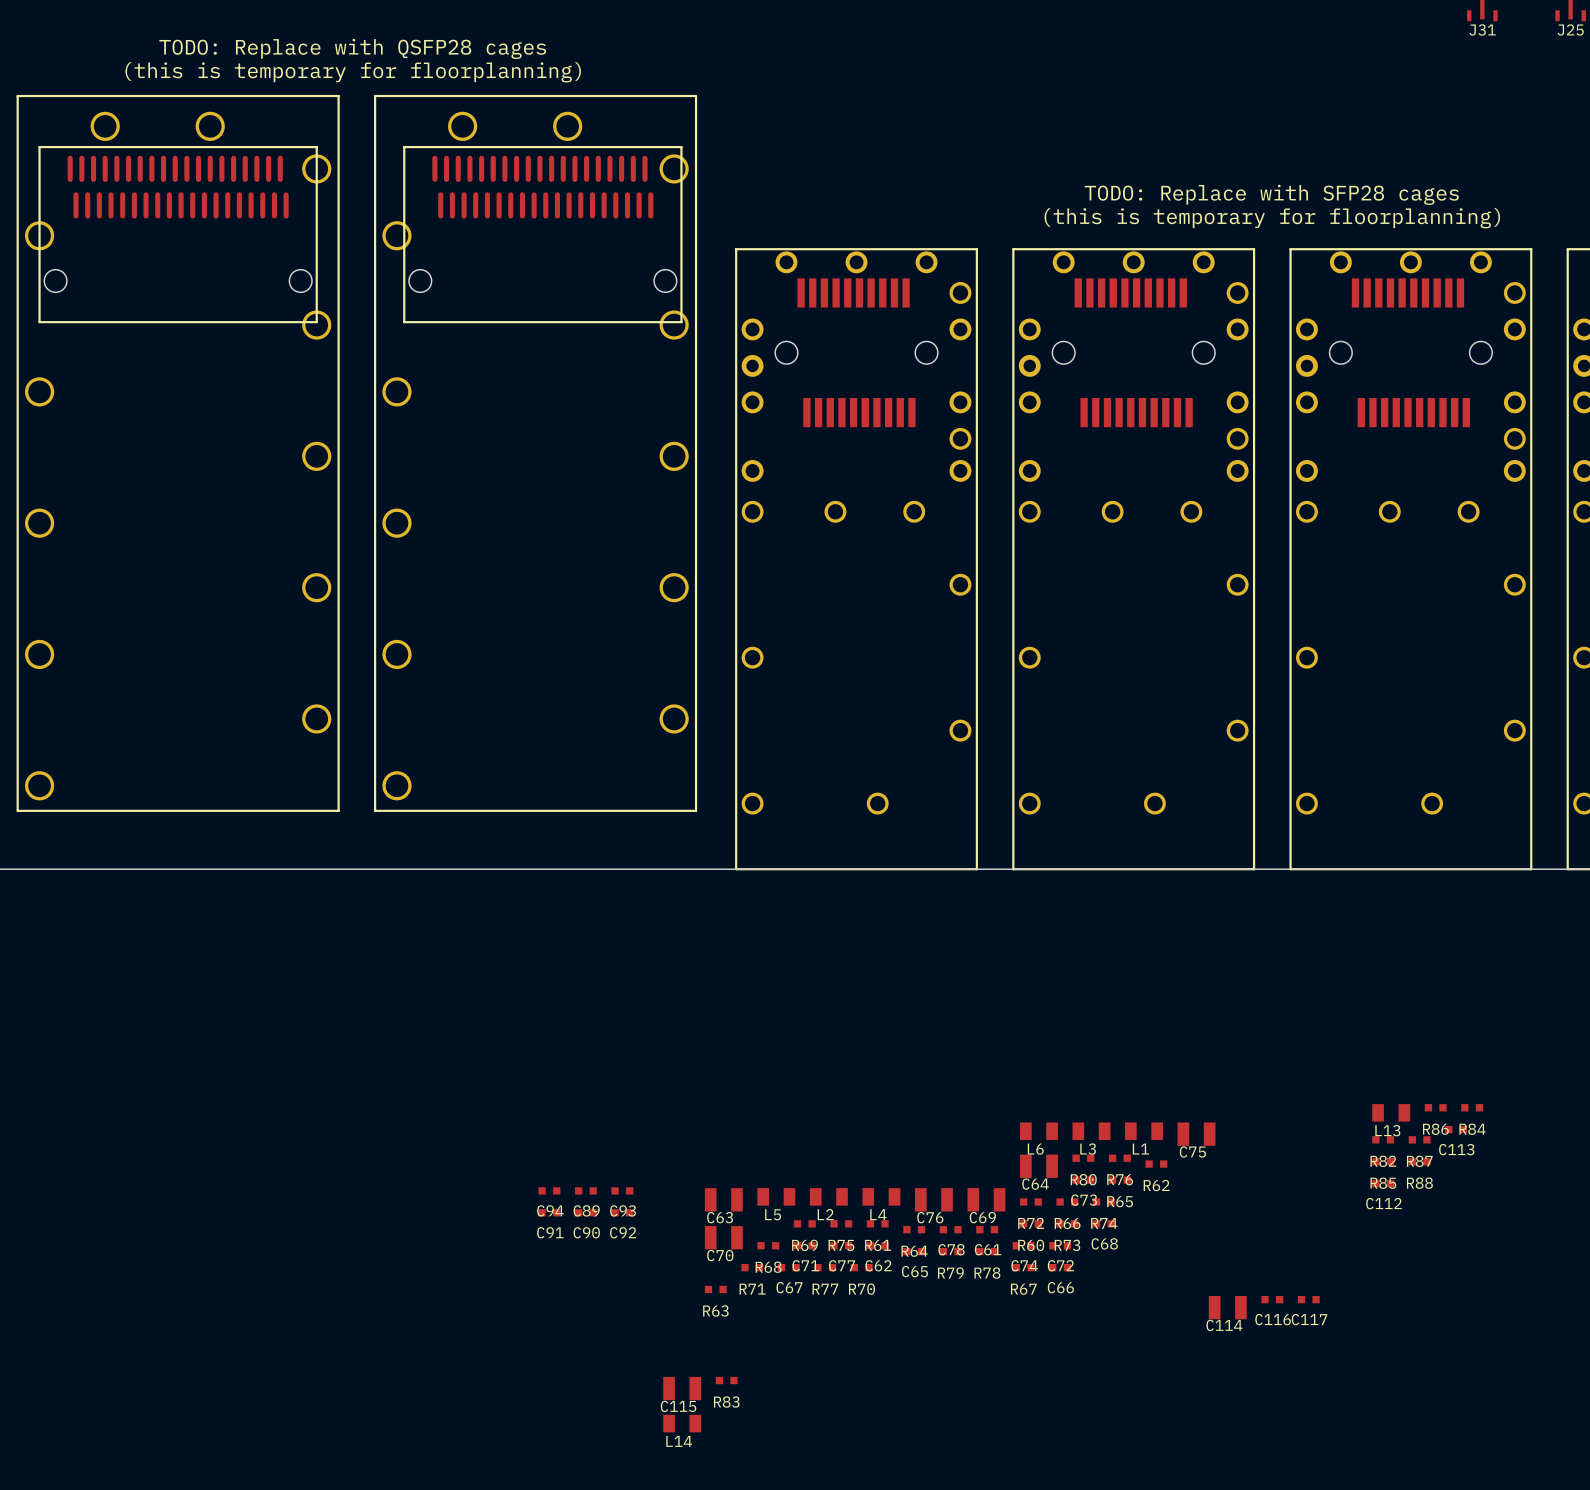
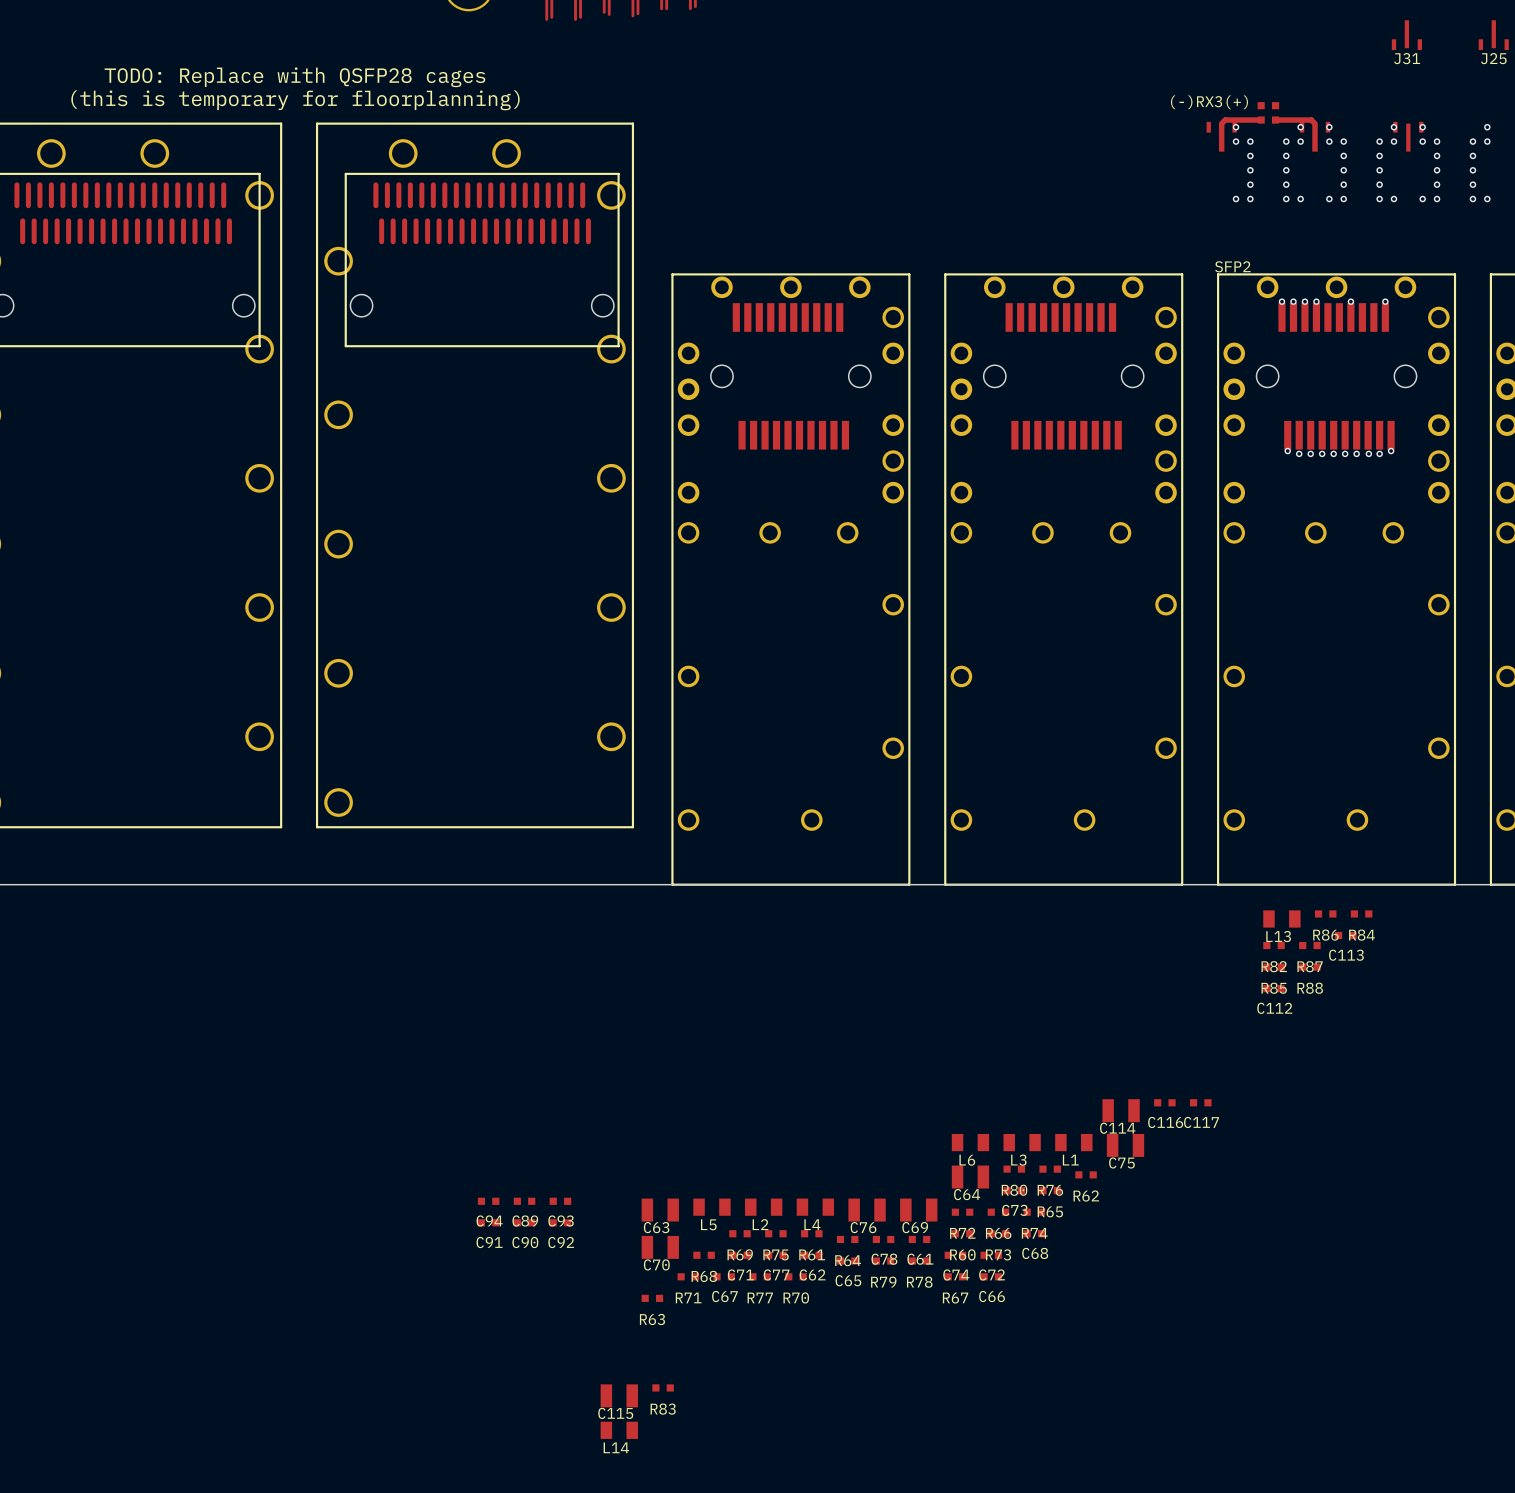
text: none -> (-)RX3(+) (1209, 102)
part: none -> (1261, 112)
part: none -> (1275, 112)
track: none -> (1261, 120) (1225, 120) (1221, 123)
track: none -> (1275, 120) (1311, 120) (1315, 123)
via: none -> (1236, 127)
via: none -> (1300, 127)
via: none -> (1329, 127)
via: none -> (1393, 127)
via: none -> (1422, 127)
via: none -> (1487, 127)
via: none -> (1236, 141)
via: none -> (1250, 141)
via: none -> (1286, 141)
via: none -> (1300, 141)
via: none -> (1329, 141)
via: none -> (1343, 141)
via: none -> (1379, 141)
via: none -> (1393, 141)
via: none -> (1422, 141)
via: none -> (1437, 141)
via: none -> (1472, 141)
via: none -> (1487, 141)
part: none -> (1221, 146)
part: none -> (1315, 146)
part: none -> (1408, 146)
via: none -> (1250, 155)
via: none -> (1286, 155)
via: none -> (1343, 155)
via: none -> (1379, 155)
via: none -> (1437, 155)
via: none -> (1472, 155)
via: none -> (1250, 170)
via: none -> (1286, 170)
via: none -> (1343, 170)
via: none -> (1379, 170)
via: none -> (1437, 170)
via: none -> (1472, 170)
via: none -> (1250, 184)
via: none -> (1286, 184)
via: none -> (1343, 184)
via: none -> (1379, 184)
via: none -> (1437, 184)
via: none -> (1472, 184)
via: none -> (1236, 199)
via: none -> (1250, 199)
via: none -> (1286, 199)
via: none -> (1300, 199)
via: none -> (1329, 199)
via: none -> (1343, 199)
via: none -> (1379, 199)
via: none -> (1393, 199)
via: none -> (1422, 199)
via: none -> (1437, 199)
via: none -> (1472, 199)
via: none -> (1487, 199)
text: TODO: Replace with SFP28 cages (1271, 194) -> none
text: (this is temporary for floorplanning) (1272, 218) -> none
text: none -> SFP2 (1232, 266)
via: none -> (1281, 301)
via: none -> (1293, 301)
via: none -> (1304, 301)
via: none -> (1316, 301)
via: none -> (1350, 301)
via: none -> (1385, 301)
via: none -> (1287, 451)
via: none -> (1391, 451)
via: none -> (1299, 453)
via: none -> (1310, 453)
via: none -> (1322, 453)
via: none -> (1333, 453)
via: none -> (1345, 453)
via: none -> (1356, 453)
via: none -> (1368, 453)
via: none -> (1379, 453)
R86 position: (1435, 1107) -> (1325, 913)
R84 position: (1472, 1107) -> (1361, 913)
L13 position: (1391, 1112) -> (1281, 918)
C113 position: (1456, 1129) -> (1345, 935)
R82 position: (1383, 1139) -> (1274, 945)
R87 position: (1419, 1139) -> (1309, 945)
R85 position: (1383, 1161) -> (1274, 967)
R88 position: (1419, 1161) -> (1309, 967)
C112 position: (1383, 1183) -> (1274, 988)
C116 position: (1272, 1299) -> (1164, 1102)
C117 position: (1308, 1299) -> (1200, 1102)
C114 position: (1227, 1307) -> (1121, 1110)

